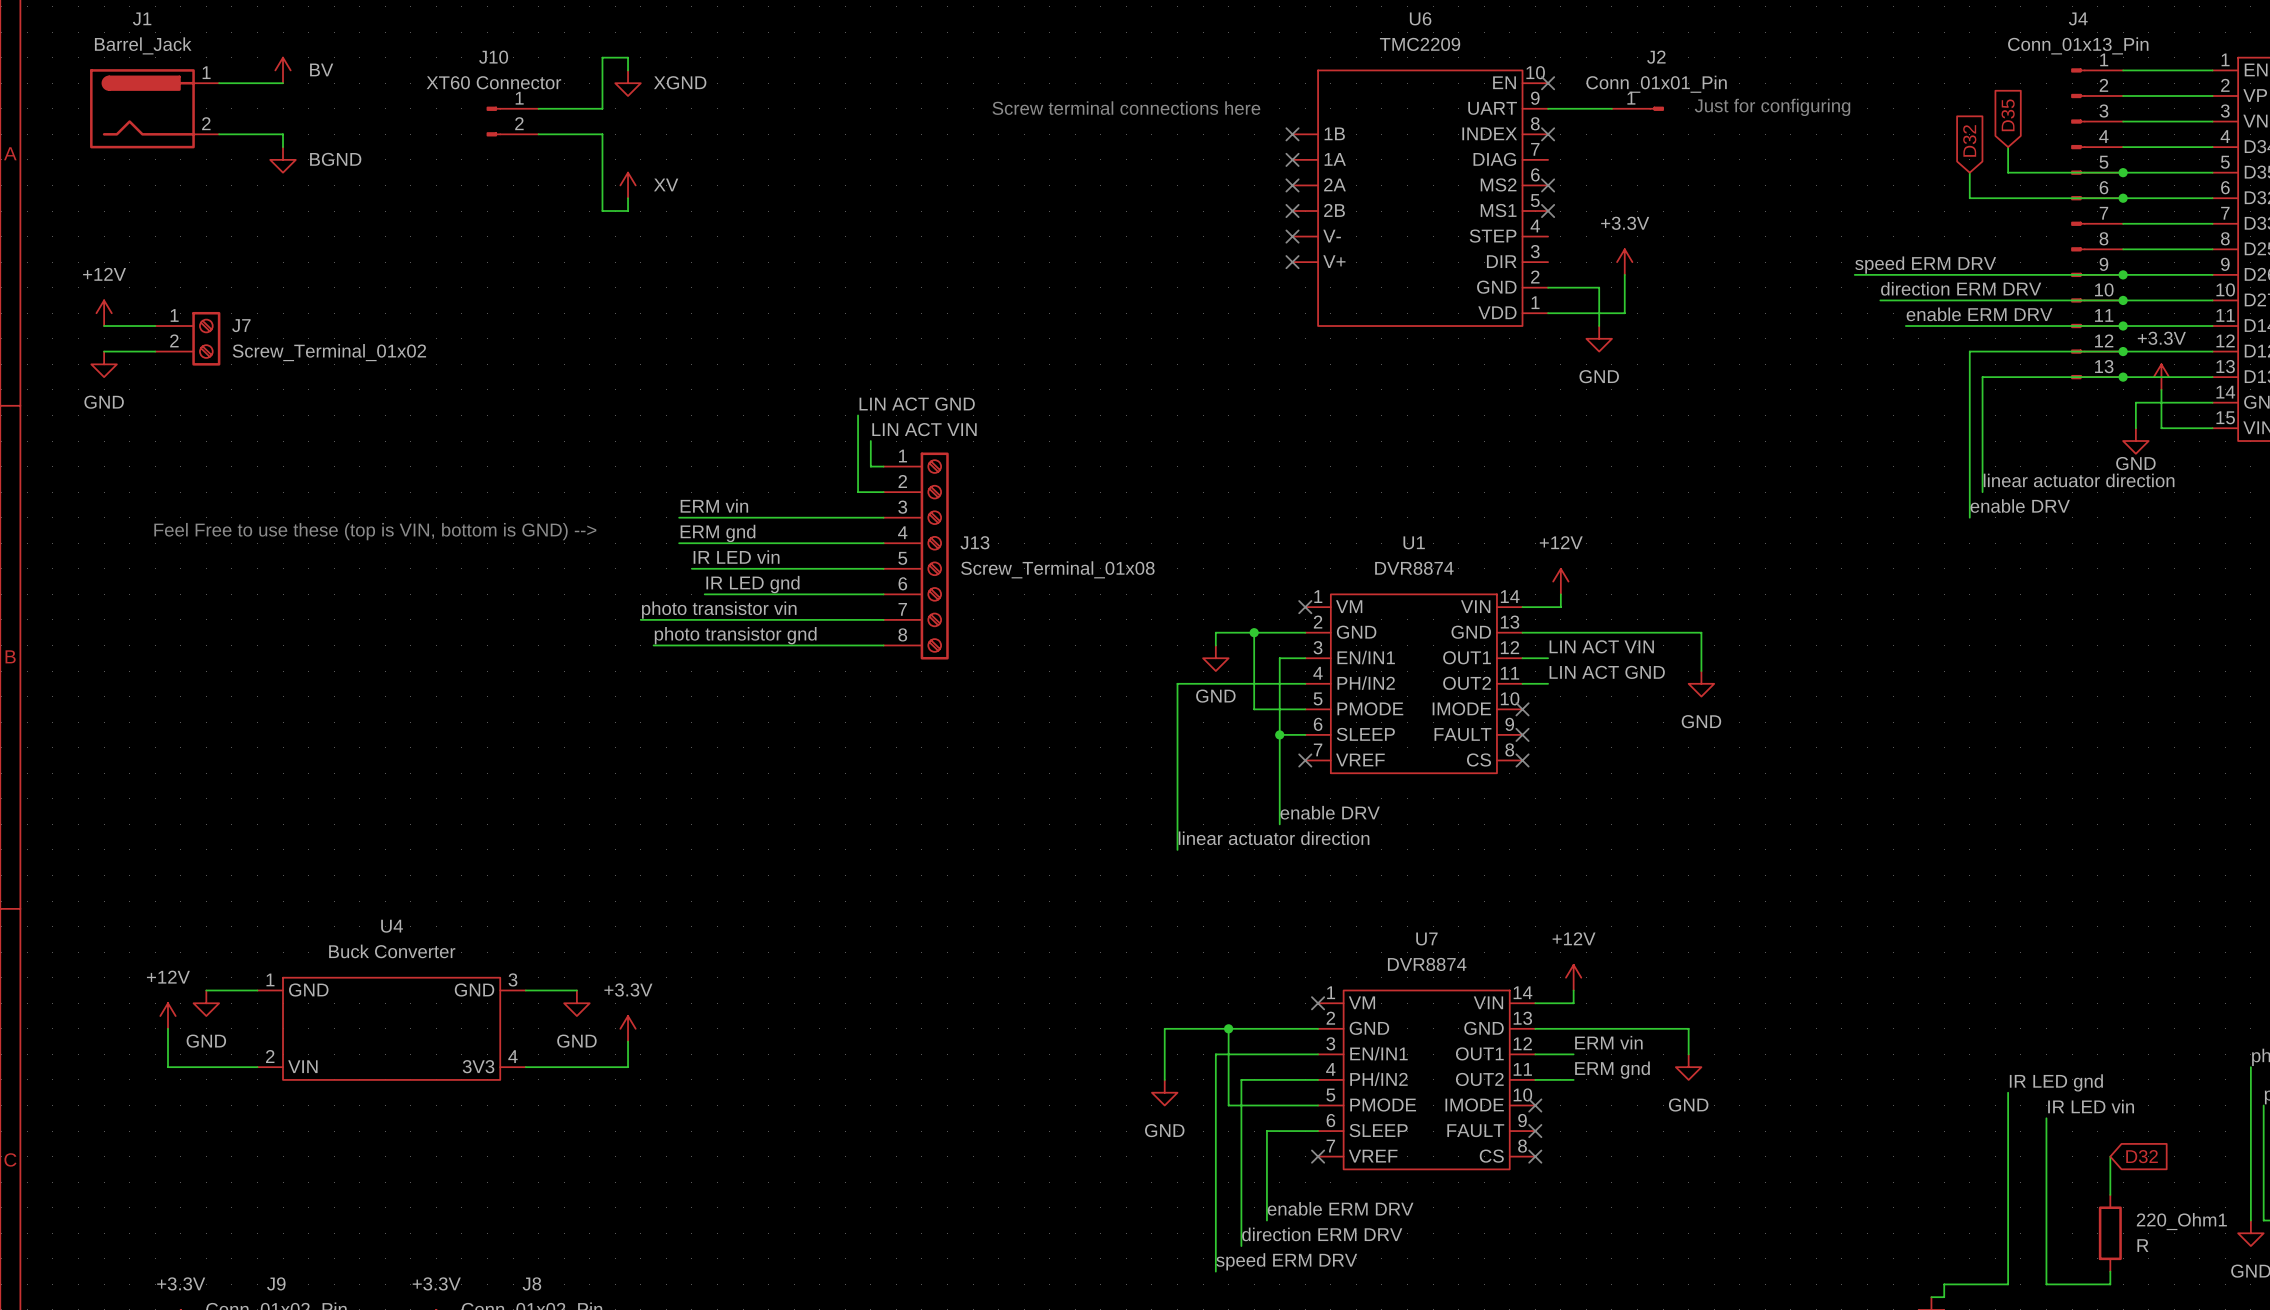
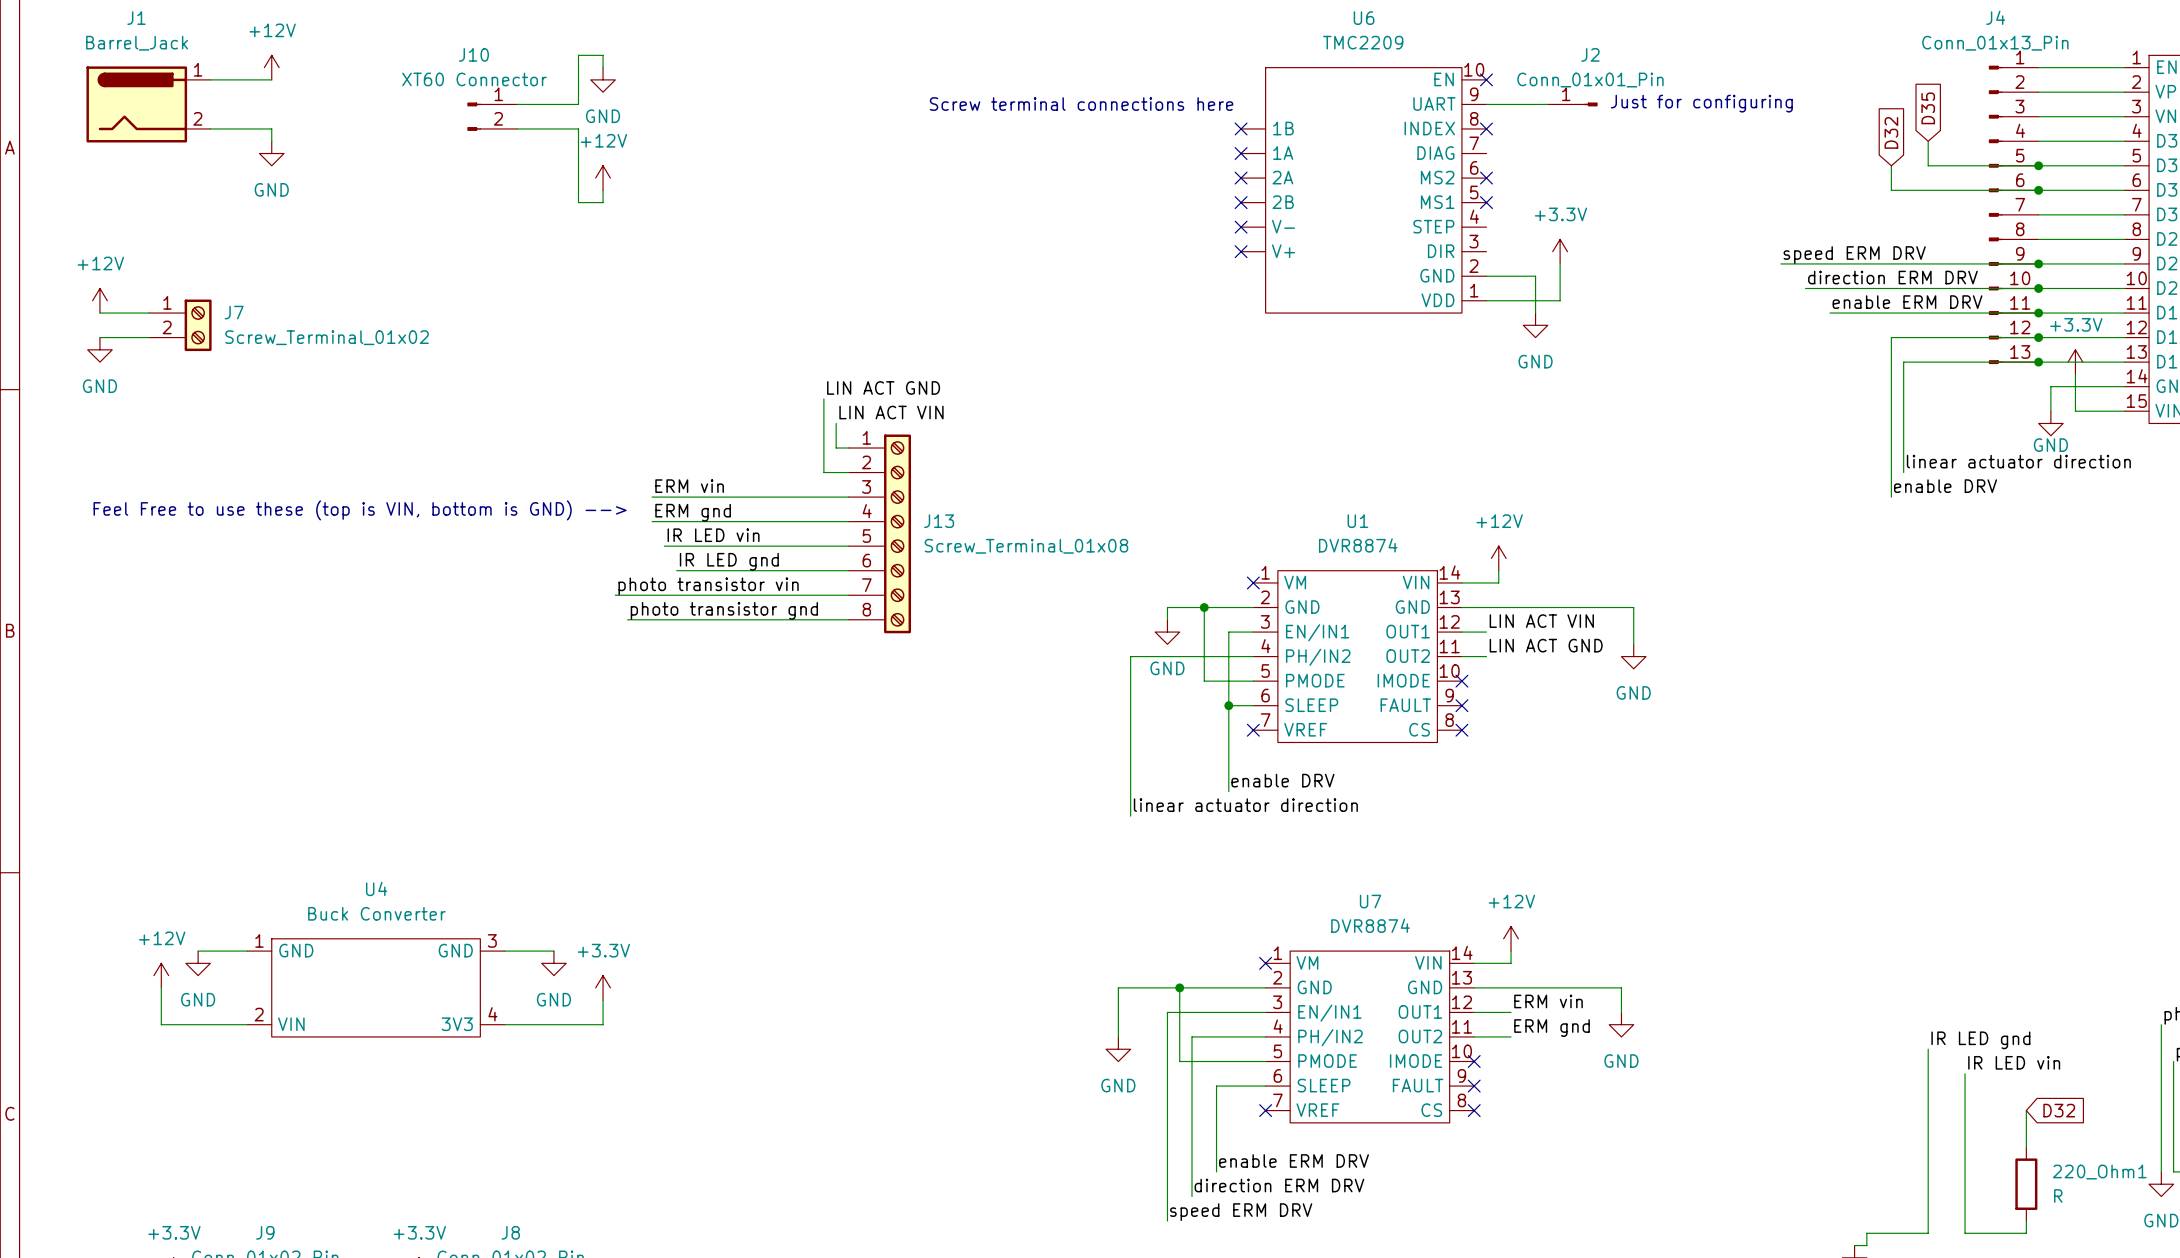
power symbol: BV (283, 70) -> +12V (271, 67)
power symbol: XGND (628, 83) -> GND (603, 79)
power symbol: BGND (283, 159) -> GND (271, 153)
power symbol: XV (628, 185) -> +12V (603, 178)

